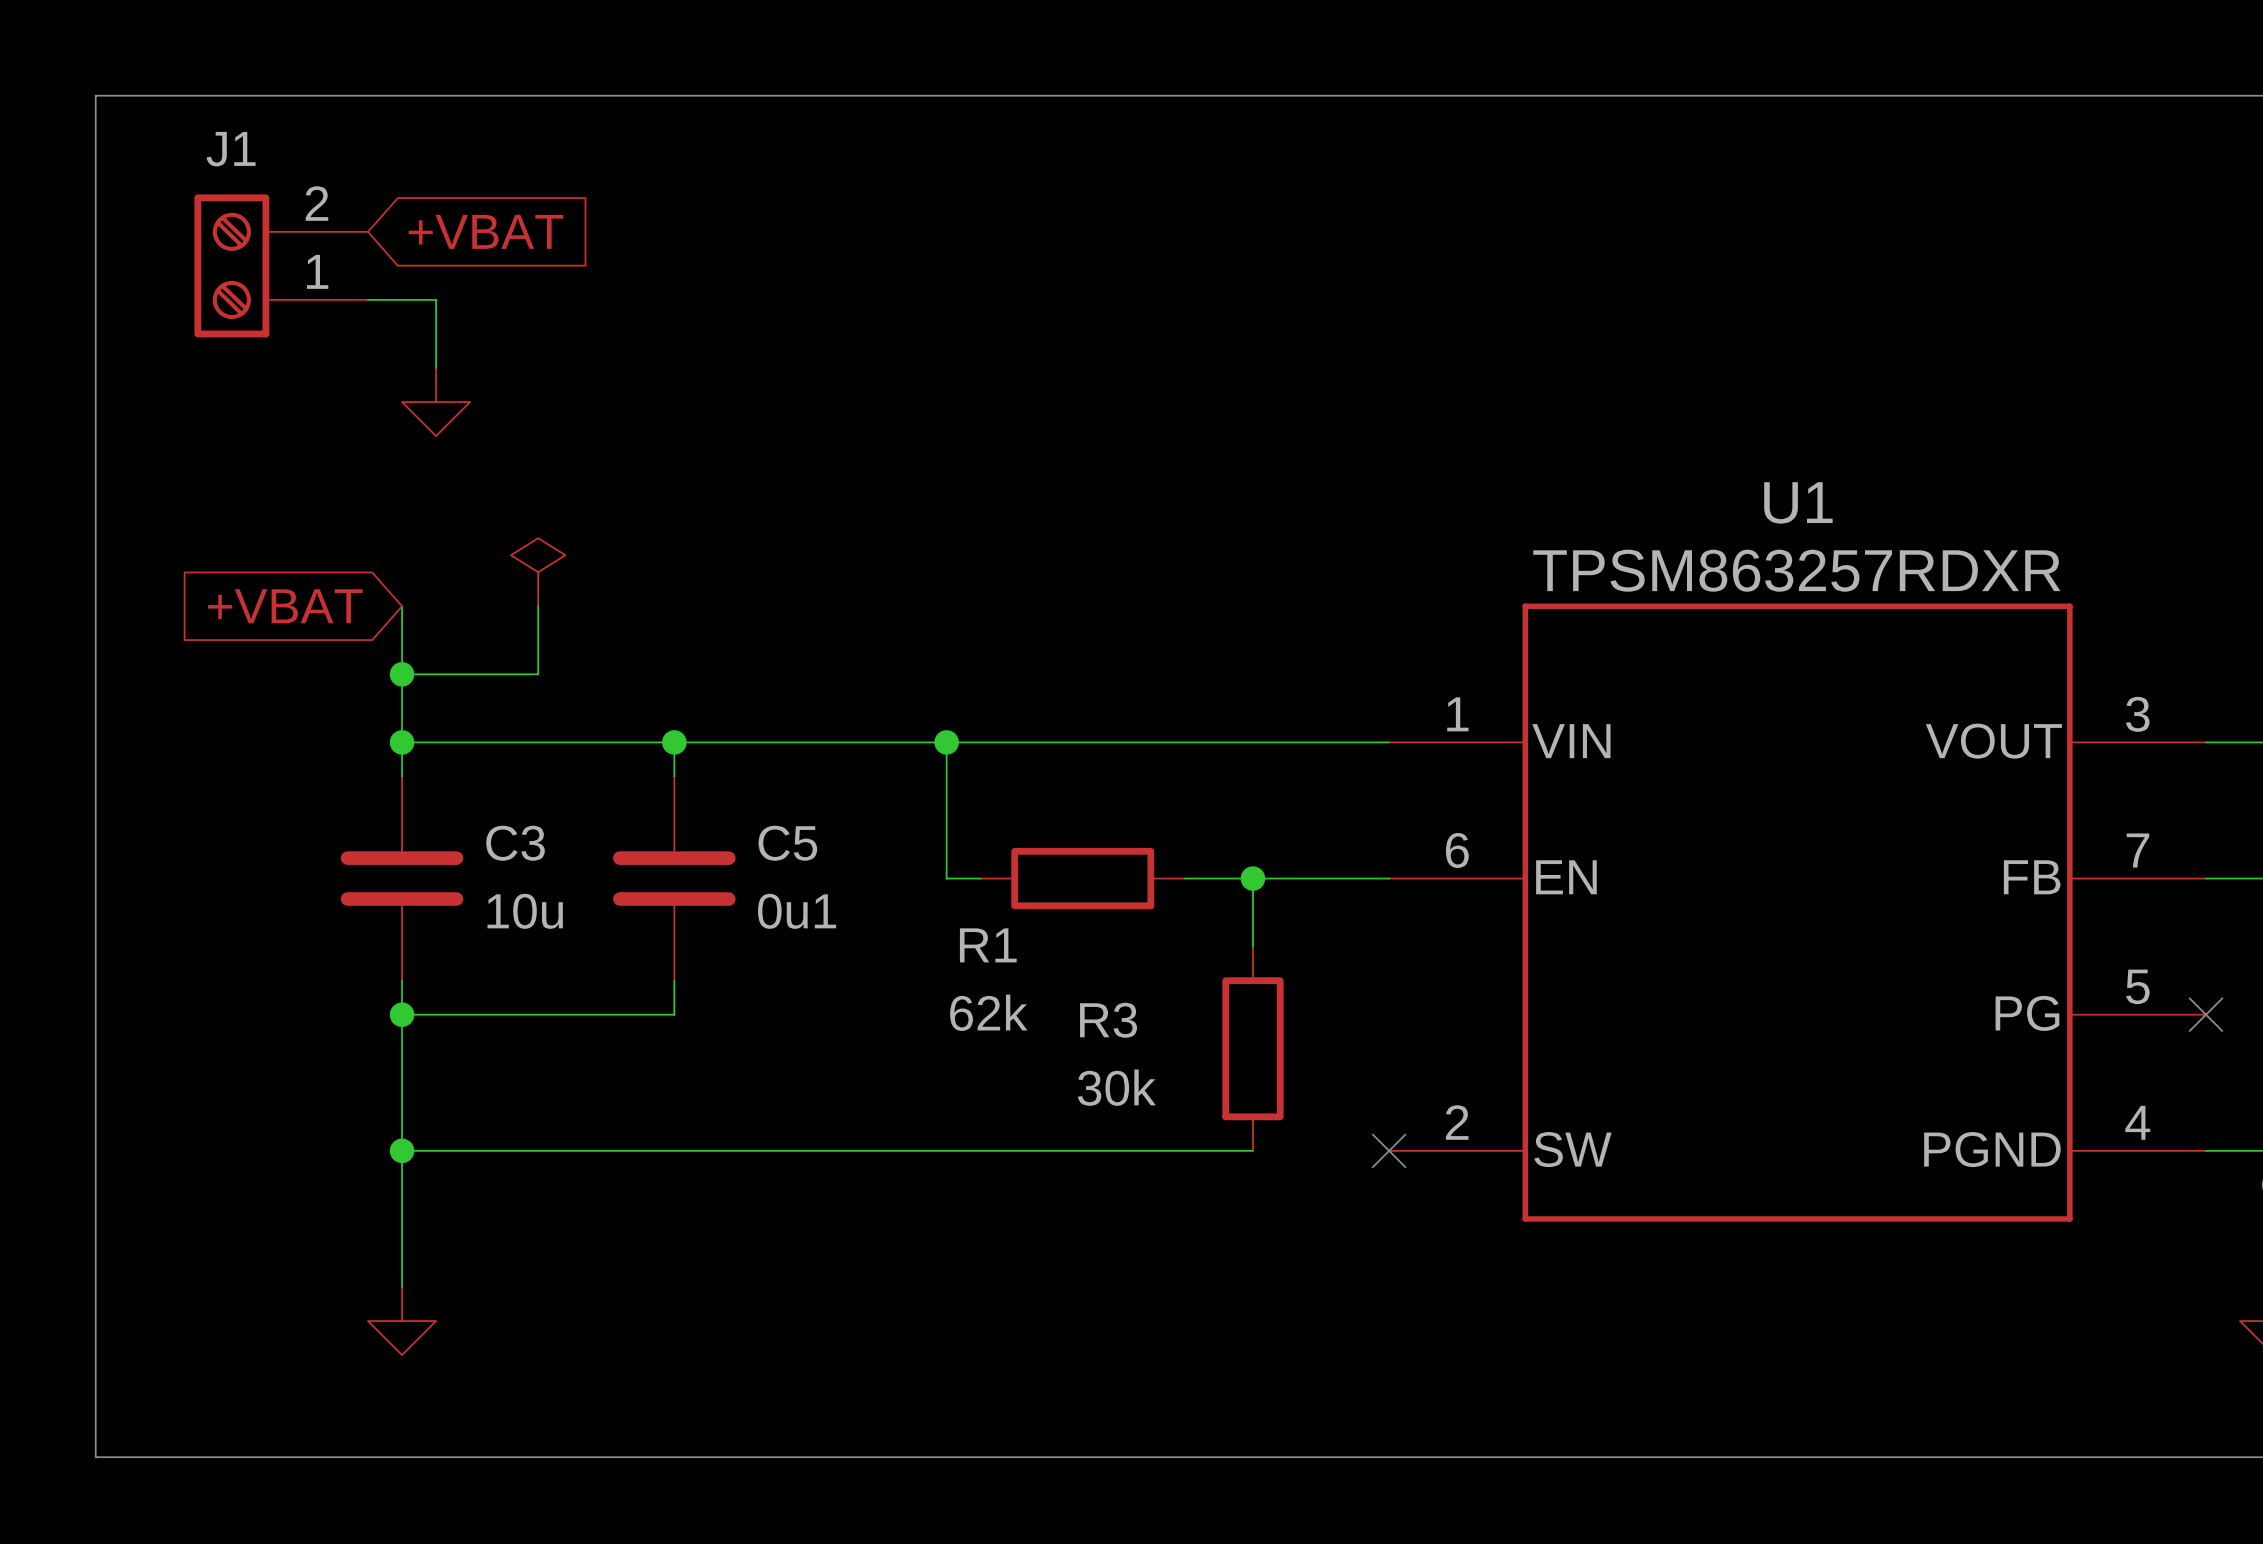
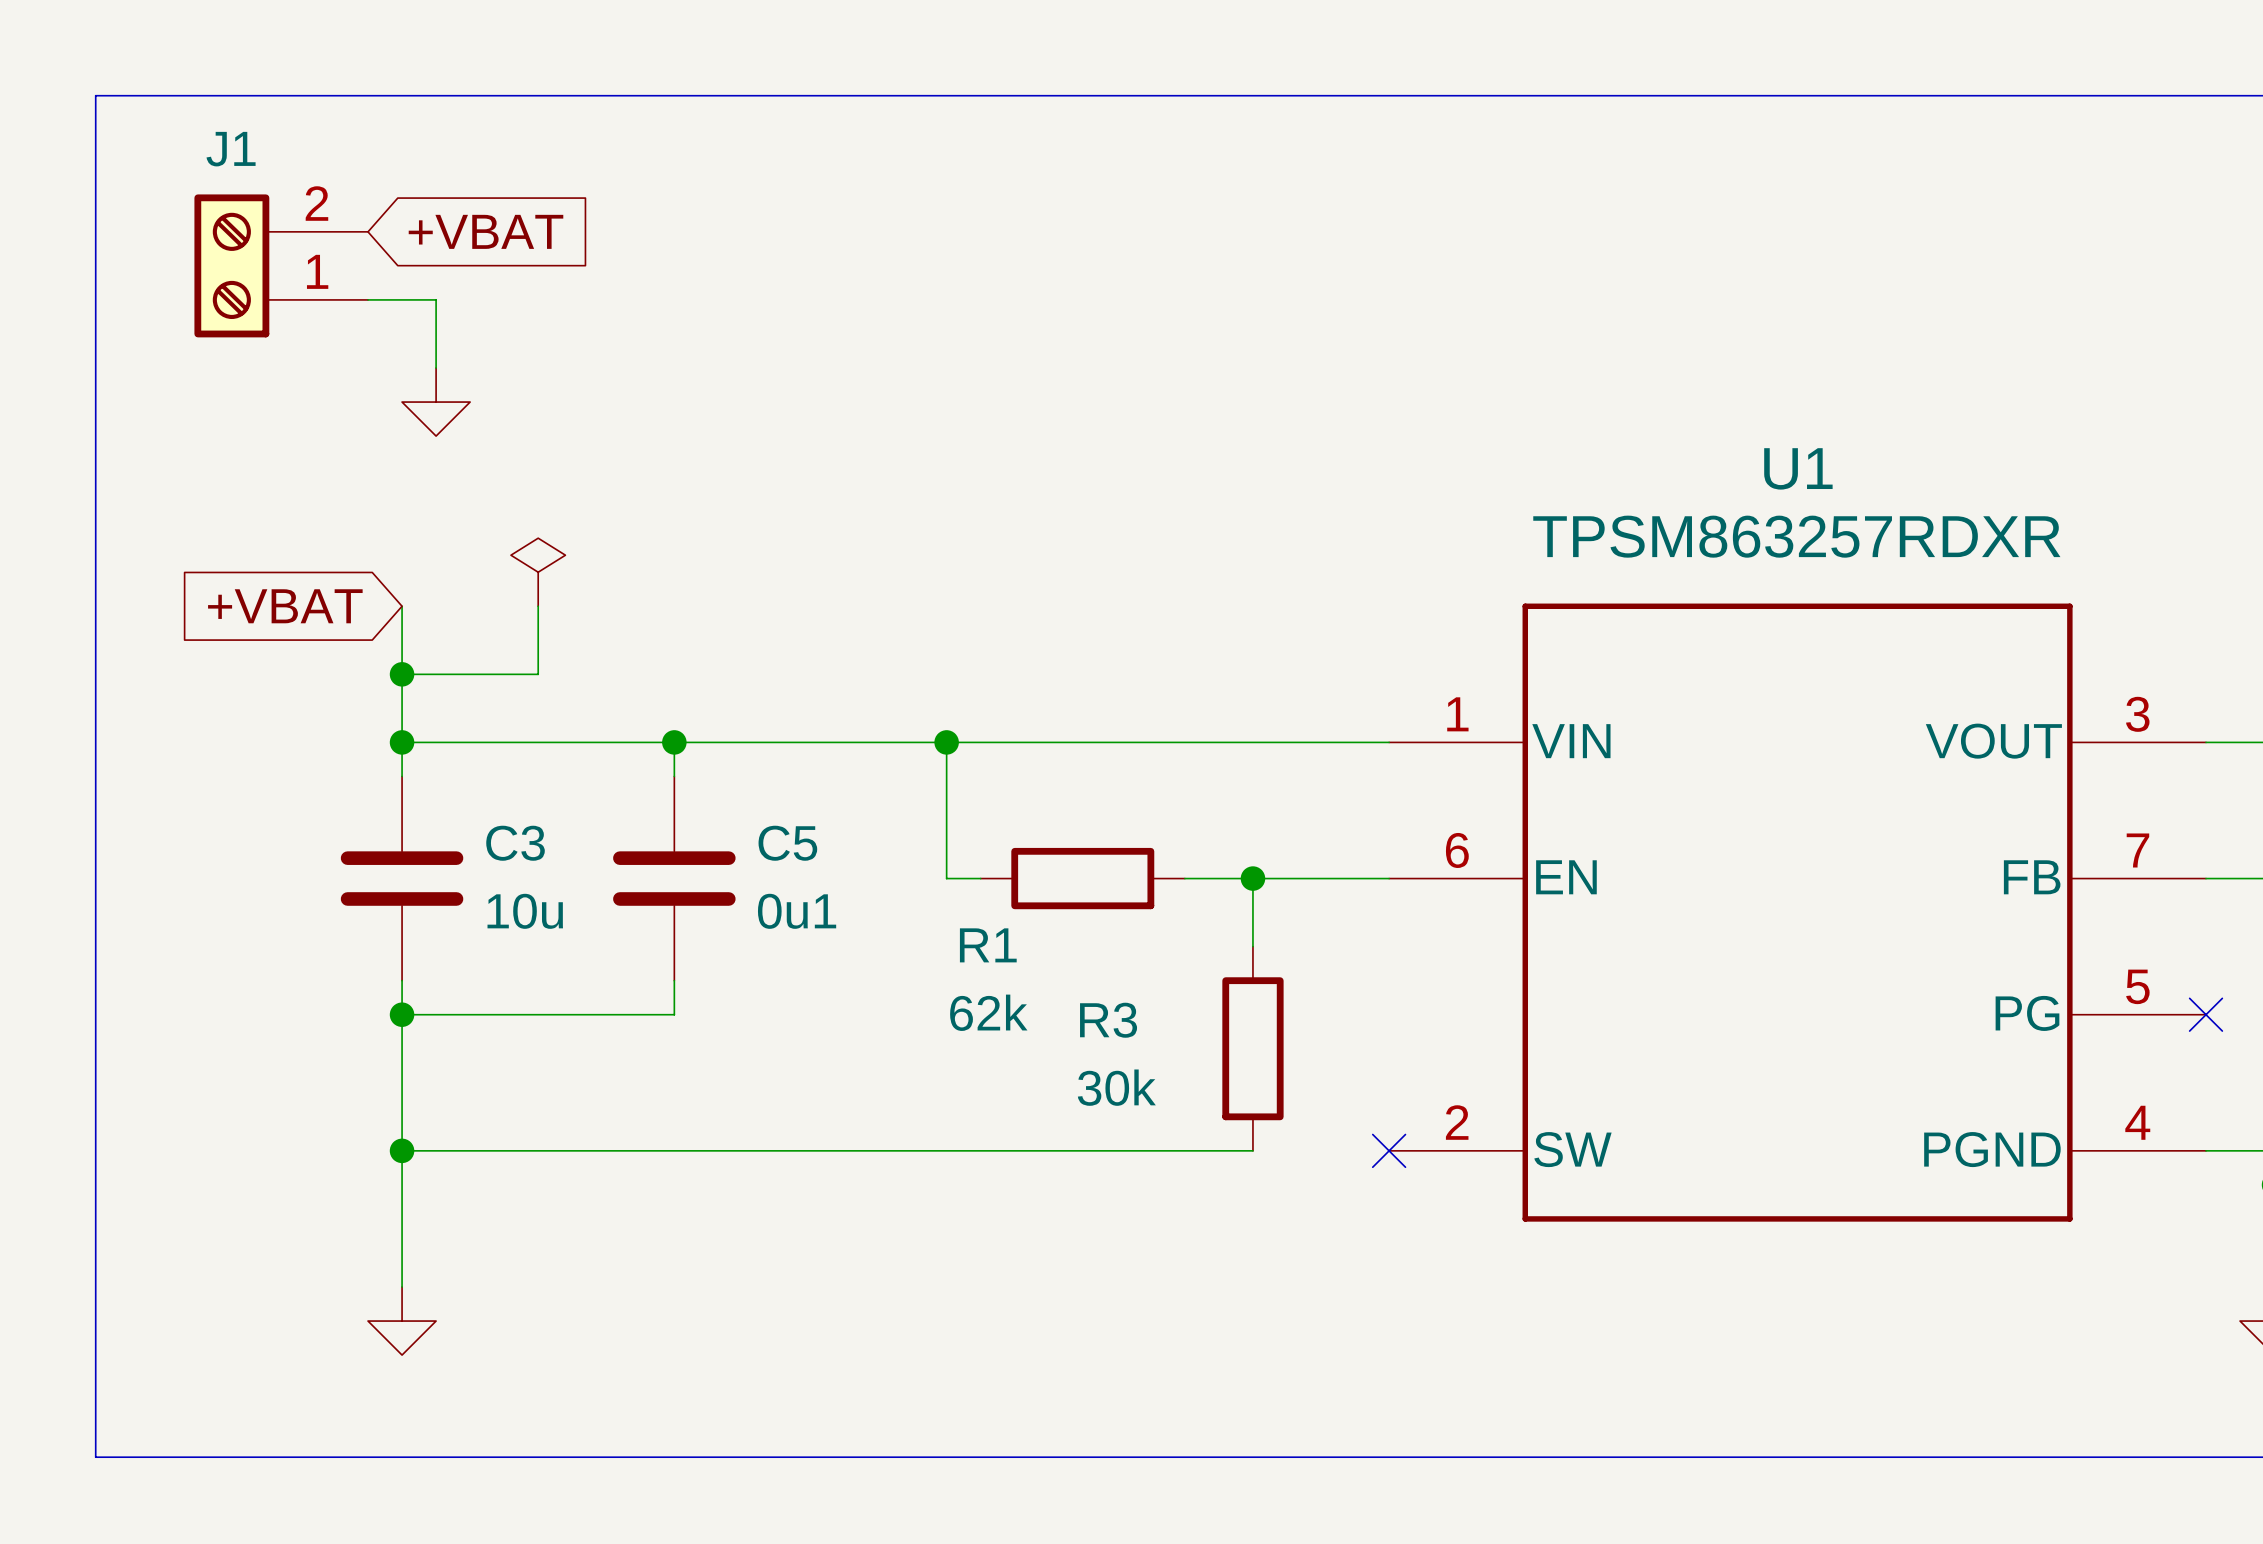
U1 name position: U1 (1798, 502) -> U1 (1798, 468)
U1 value position: TPSM863257RDXR (1796, 570) -> TPSM863257RDXR (1796, 536)

